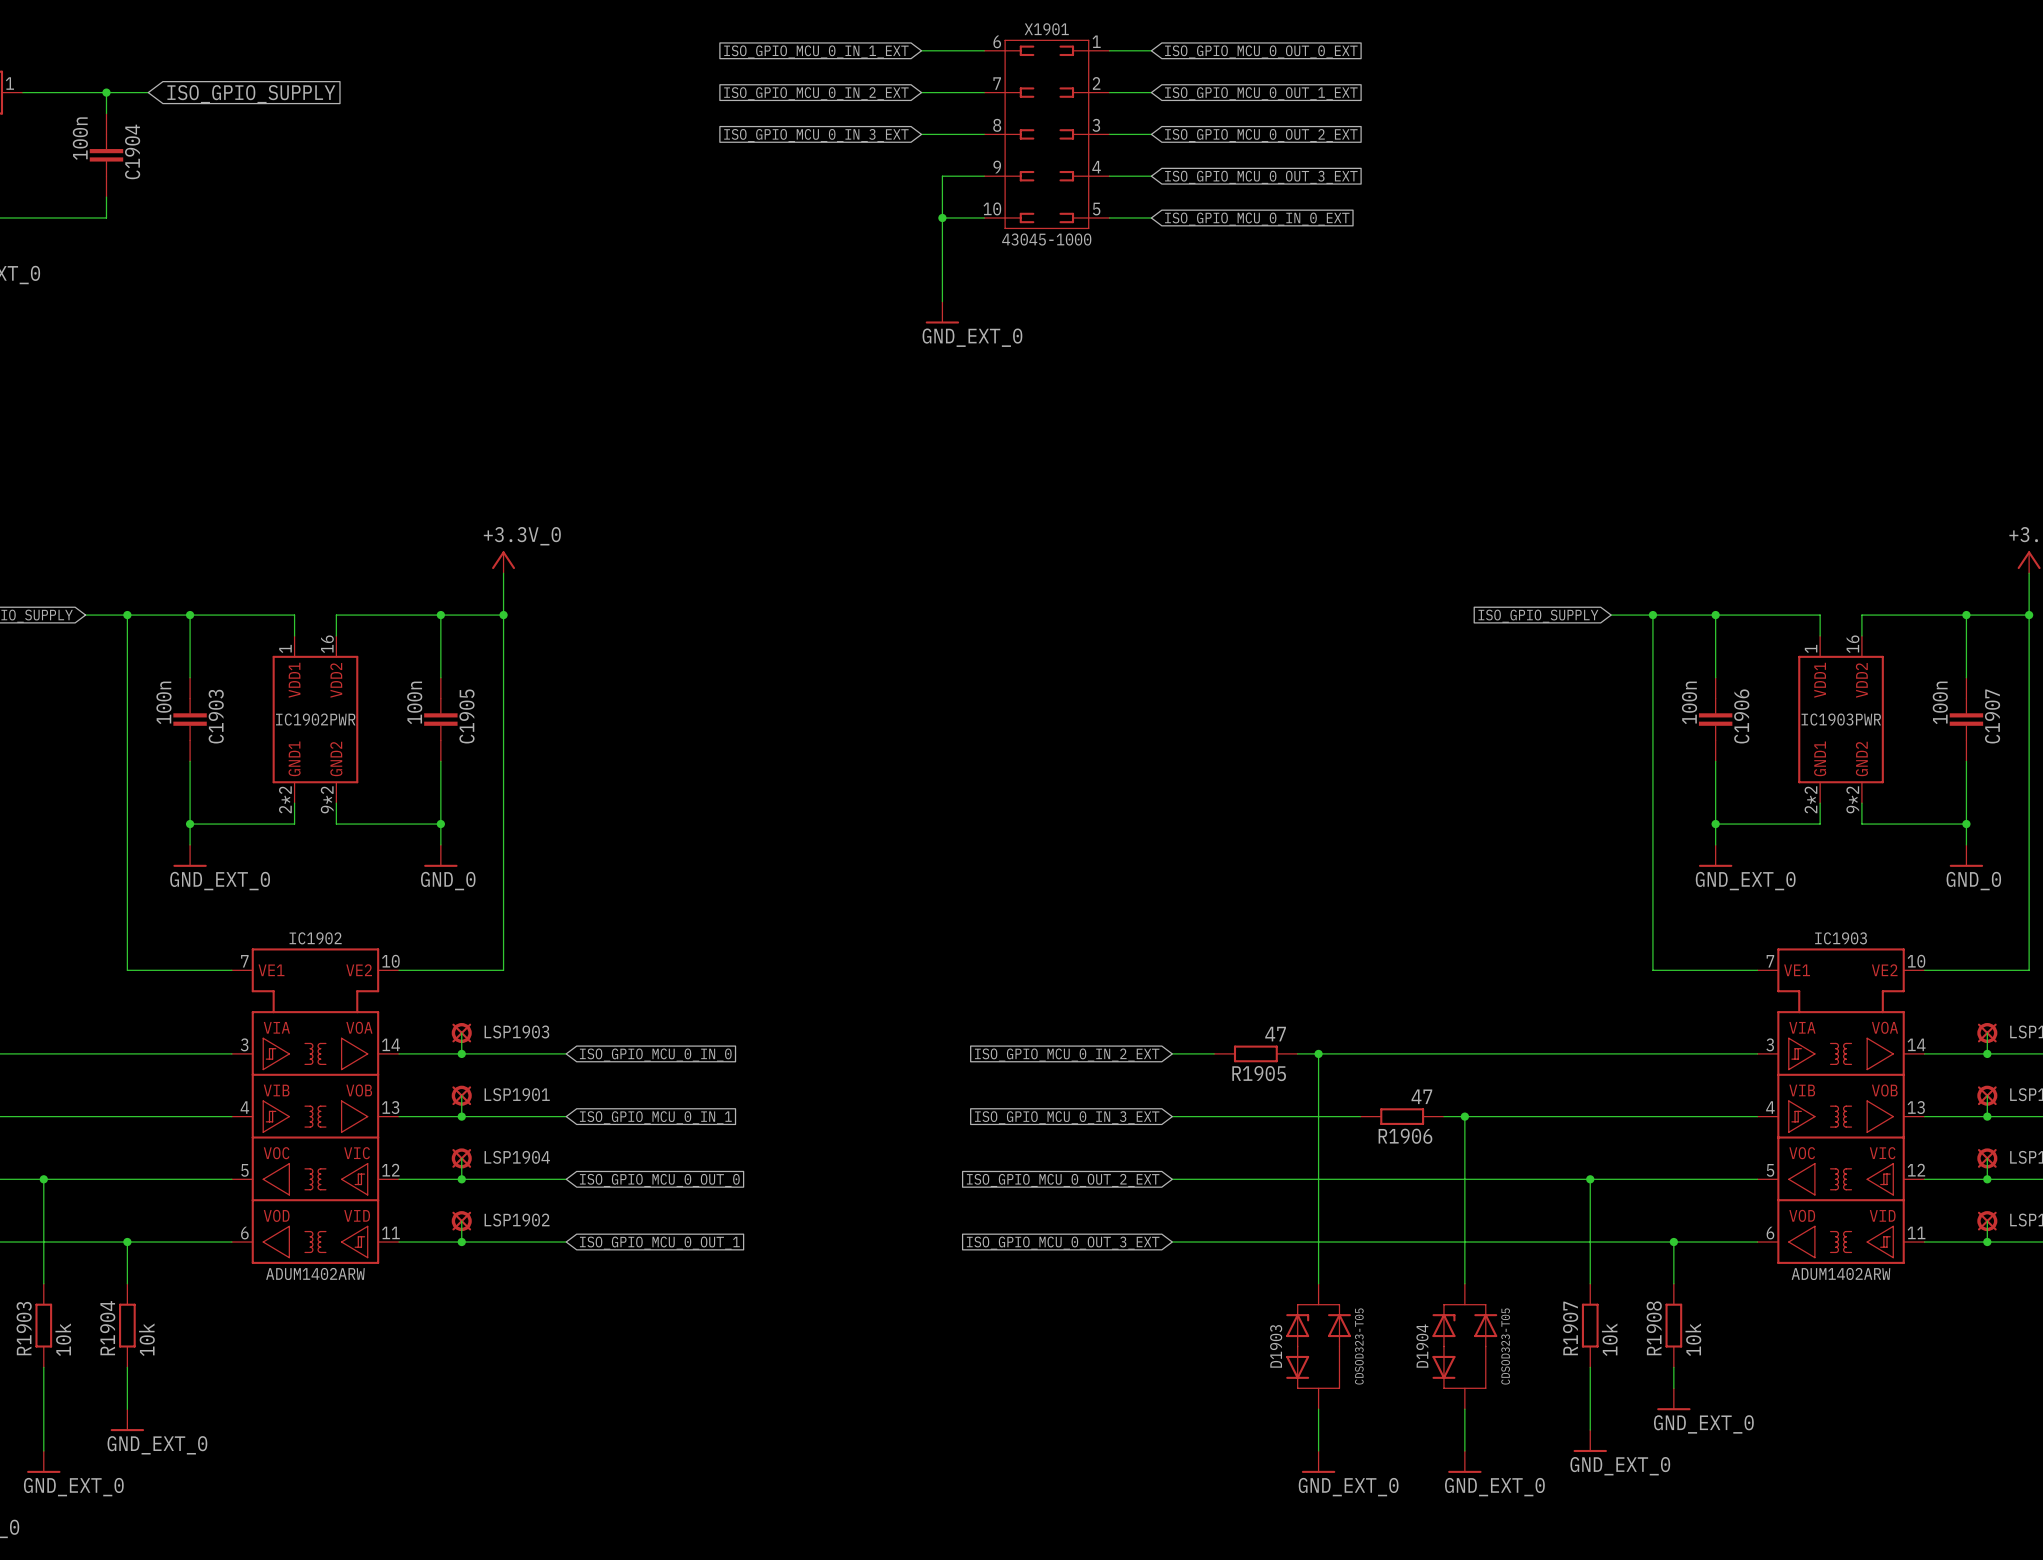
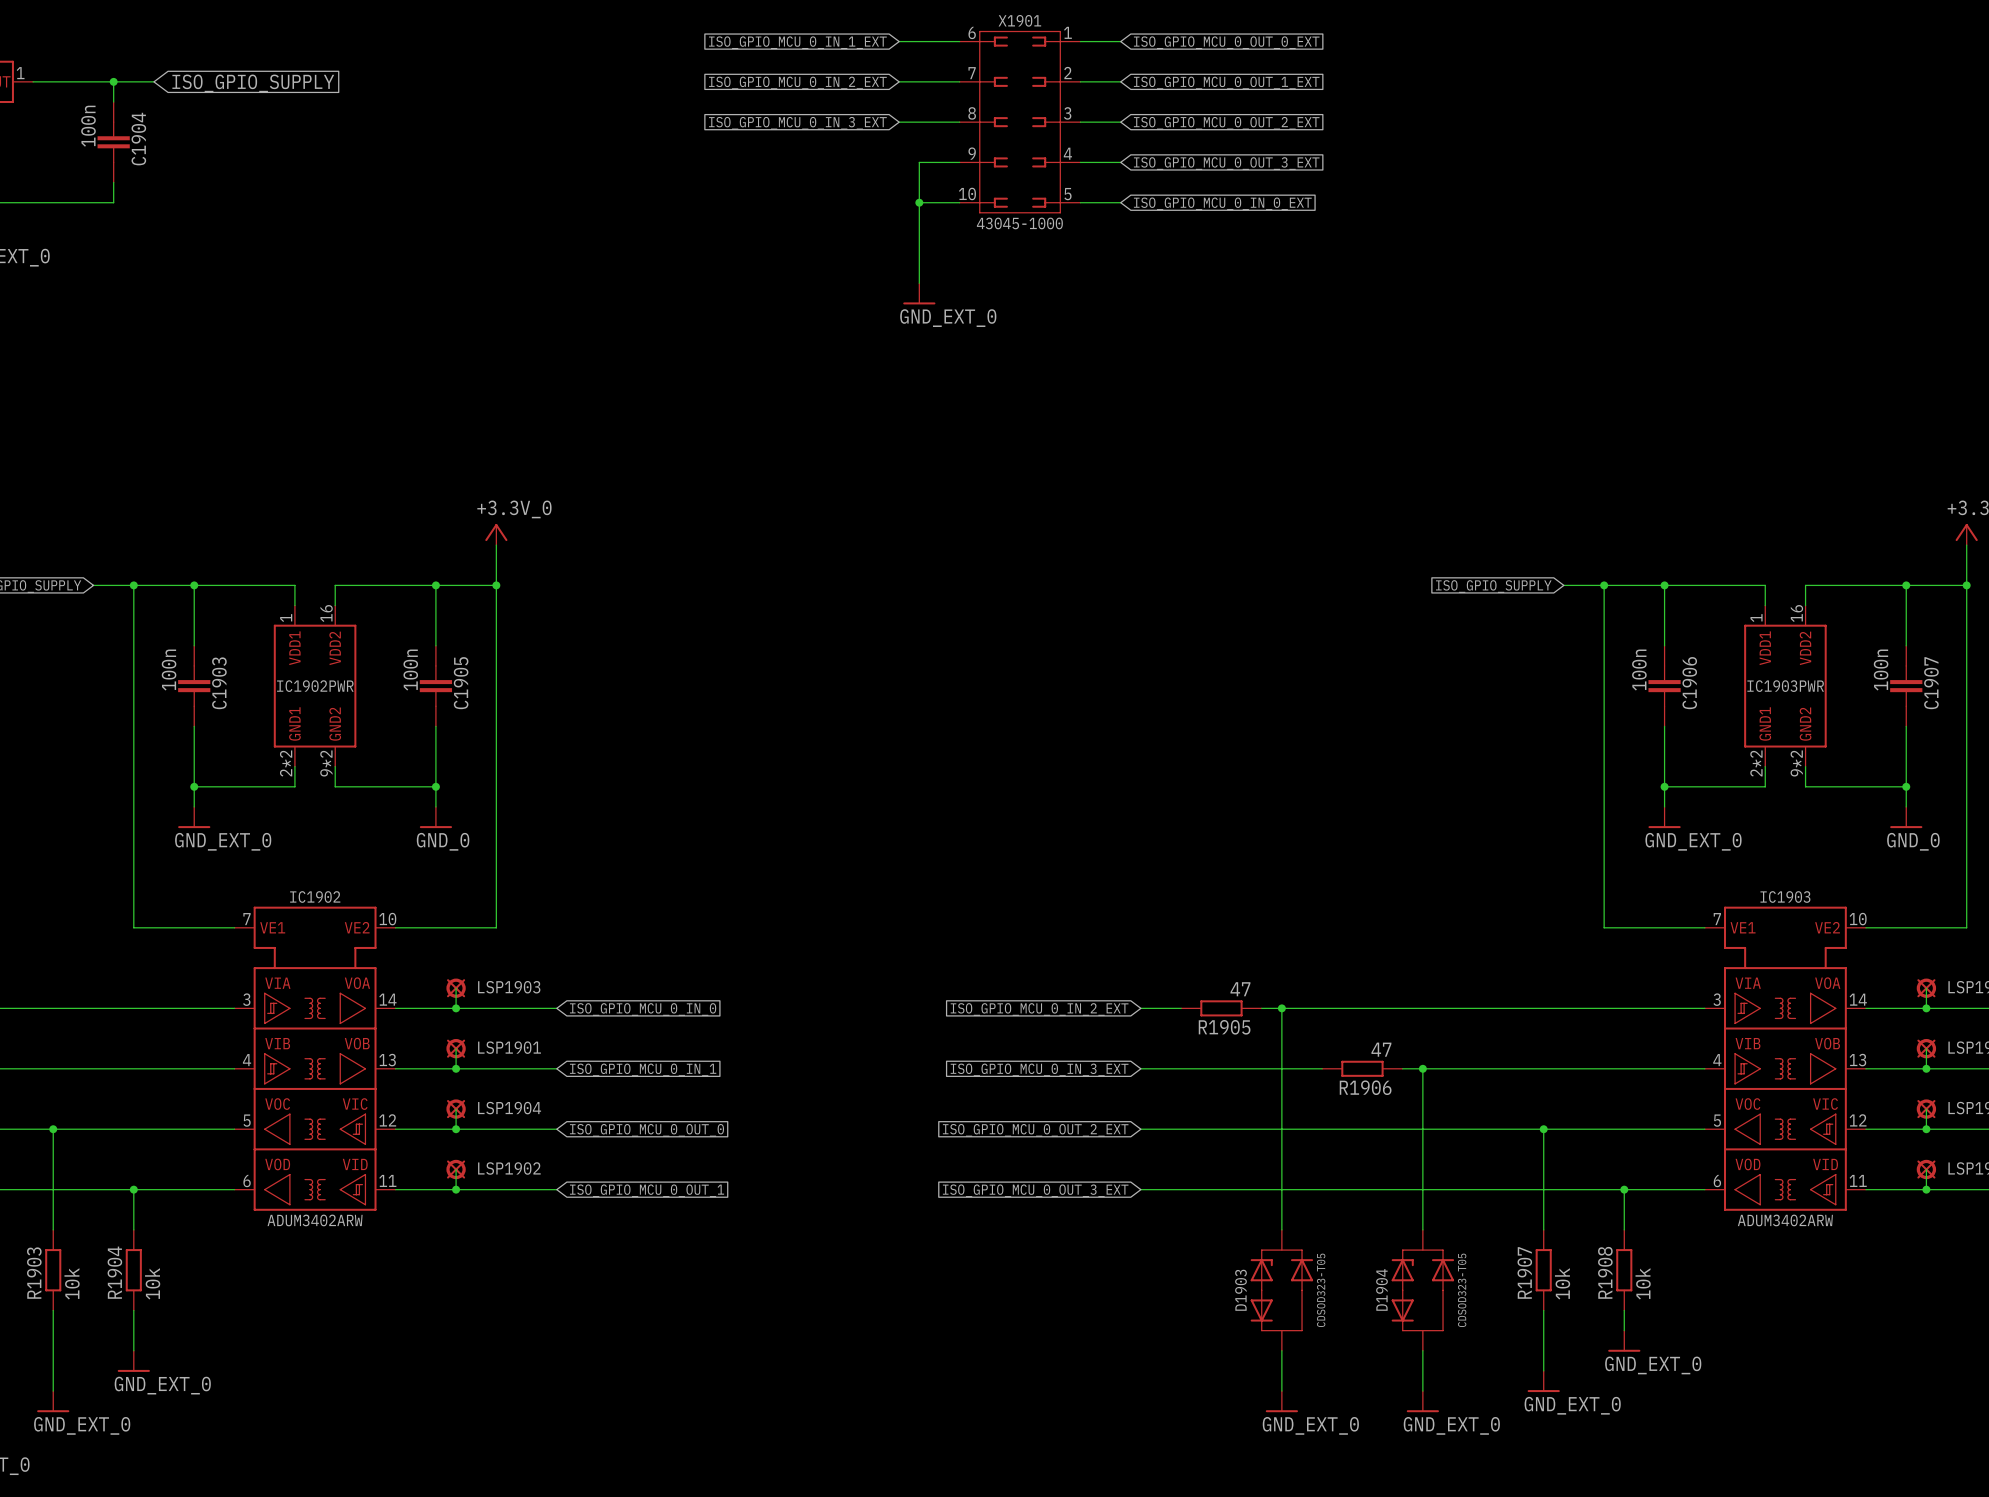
IC1902 text: ADUM1402ARW (315, 1273) -> ADUM3402ARW (315, 1220)
IC1903 text: ADUM1402ARW (1841, 1273) -> ADUM3402ARW (1785, 1220)

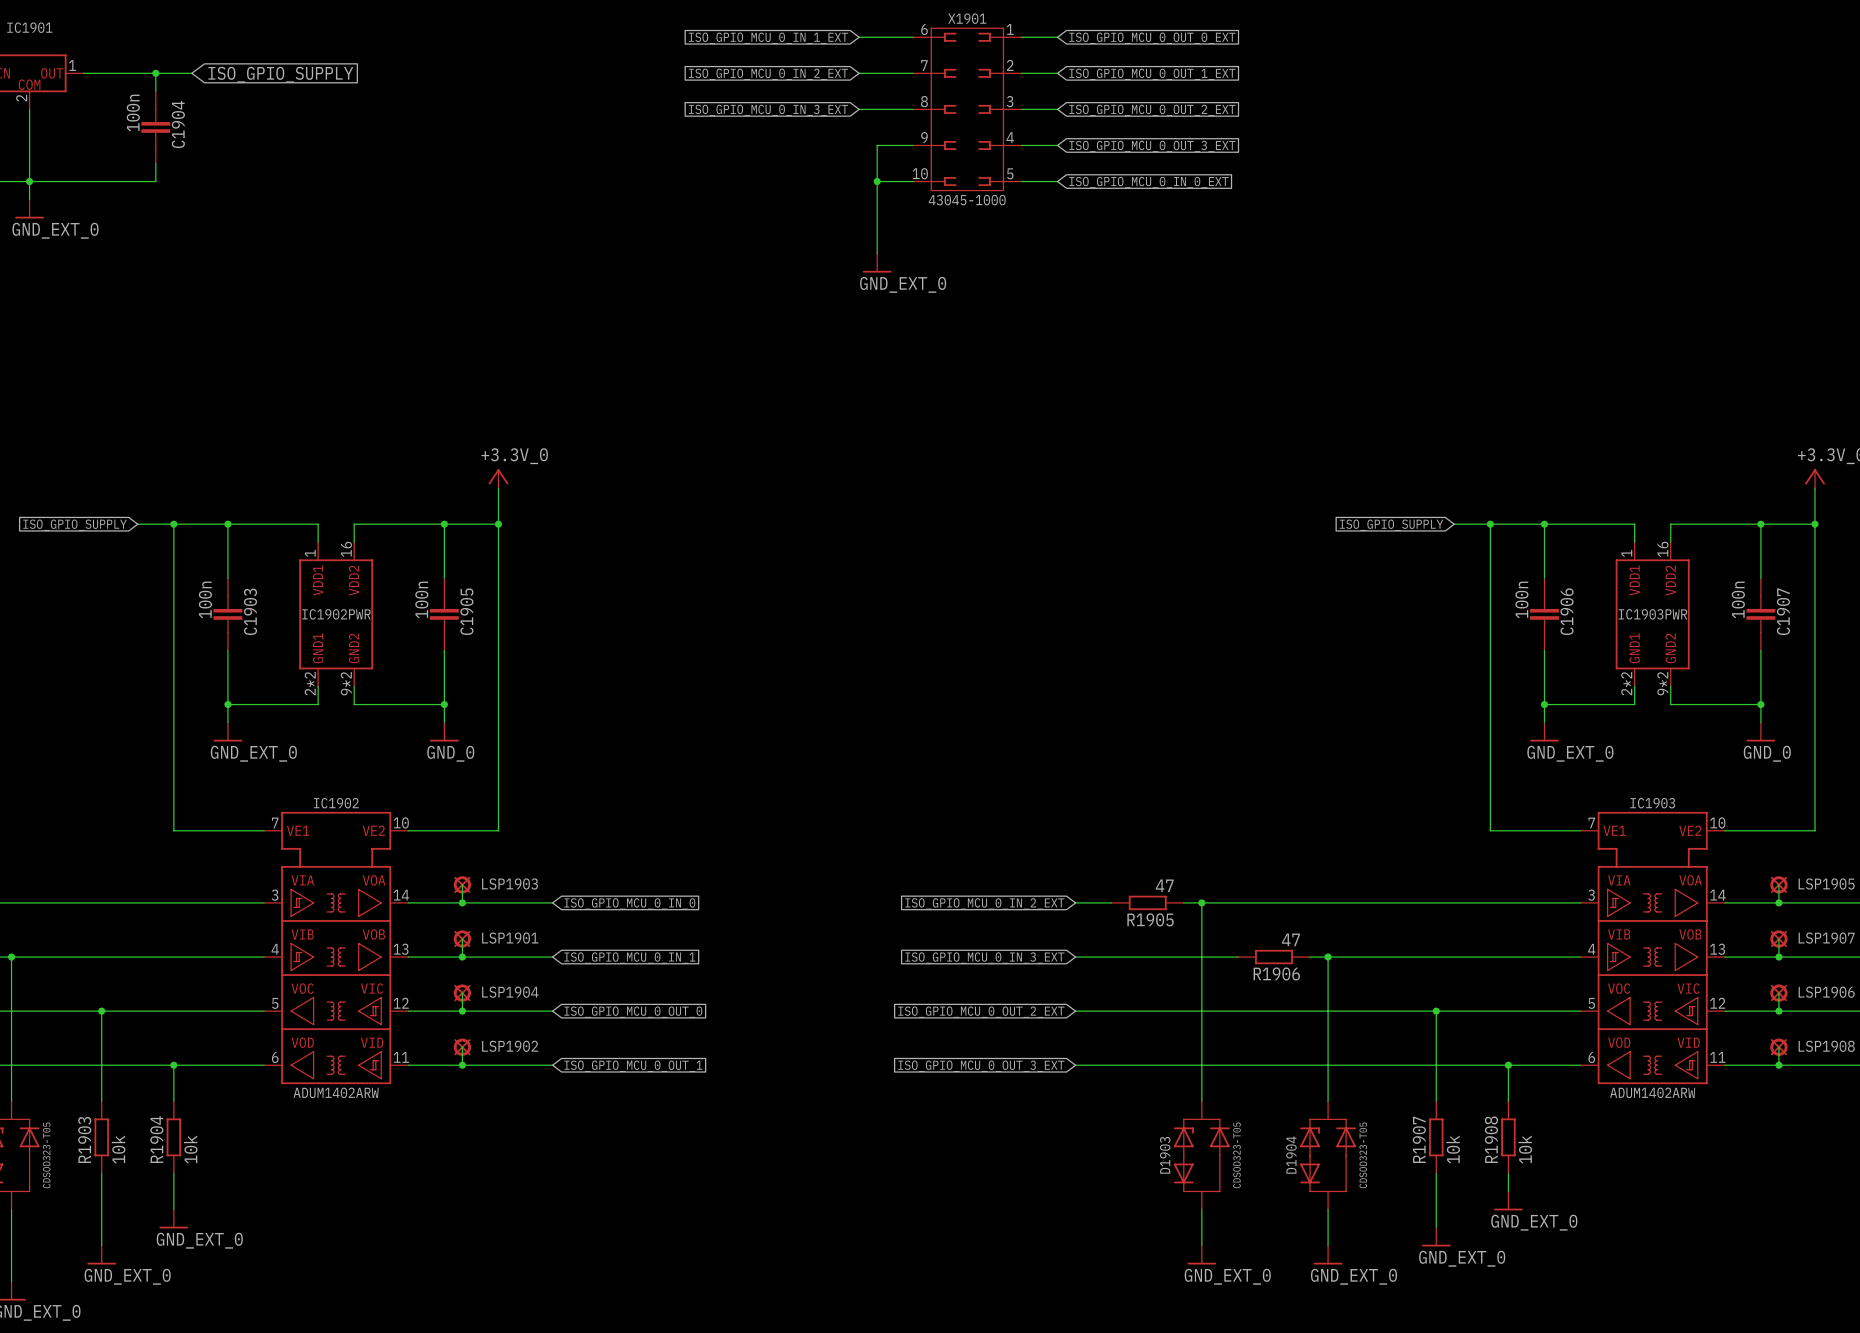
IC1902 text: ADUM3402ARW (315, 1220) -> ADUM1402ARW (336, 1092)
IC1903 text: ADUM3402ARW (1785, 1220) -> ADUM1402ARW (1652, 1092)

